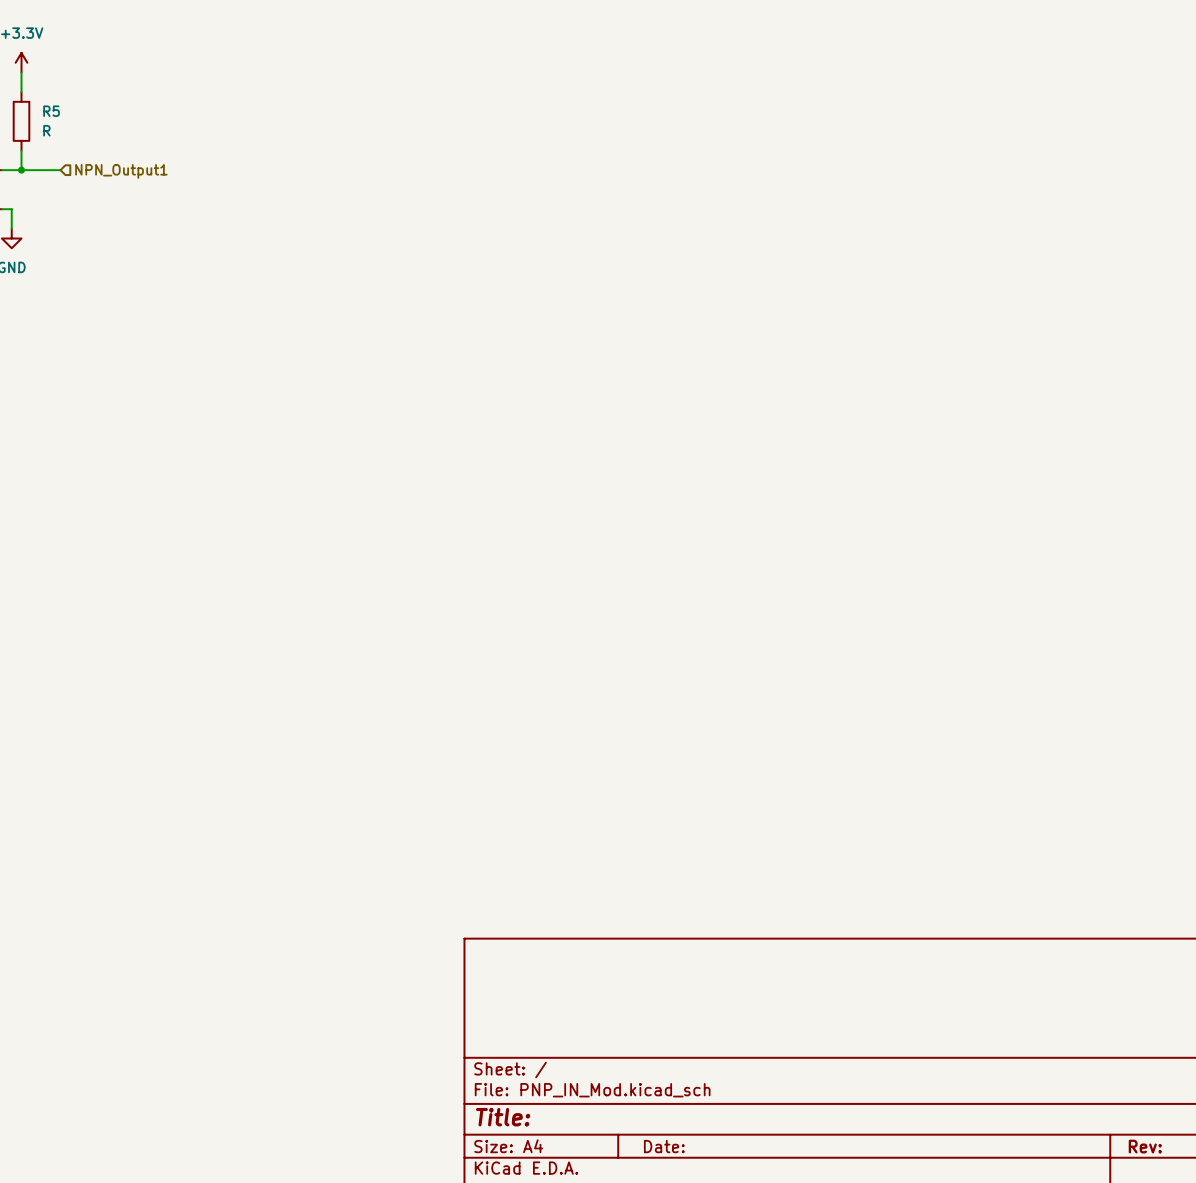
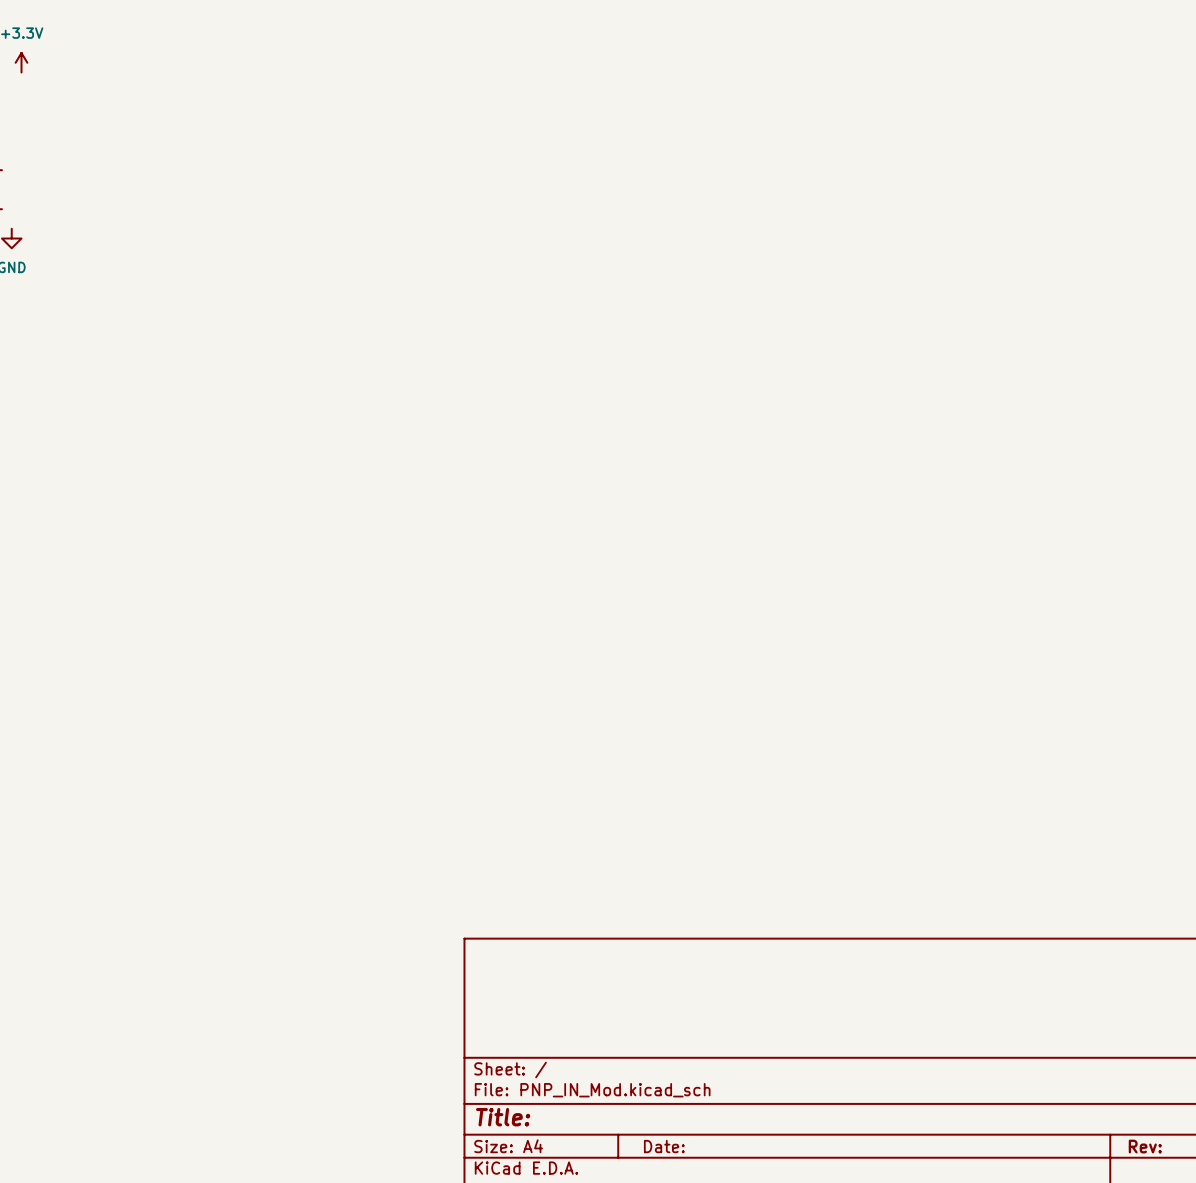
wire: (21, 72) (21, 92) -> none
R5: R (21, 121) -> none
wire: (21, 150) (21, 170) -> none
wire: (1, 170) (60, 170) -> none
junction: (21, 170) -> none
hierarchical label: NPN_Output1 (121, 171) -> none
wire: (1, 209) (11, 209) (11, 228) -> none

